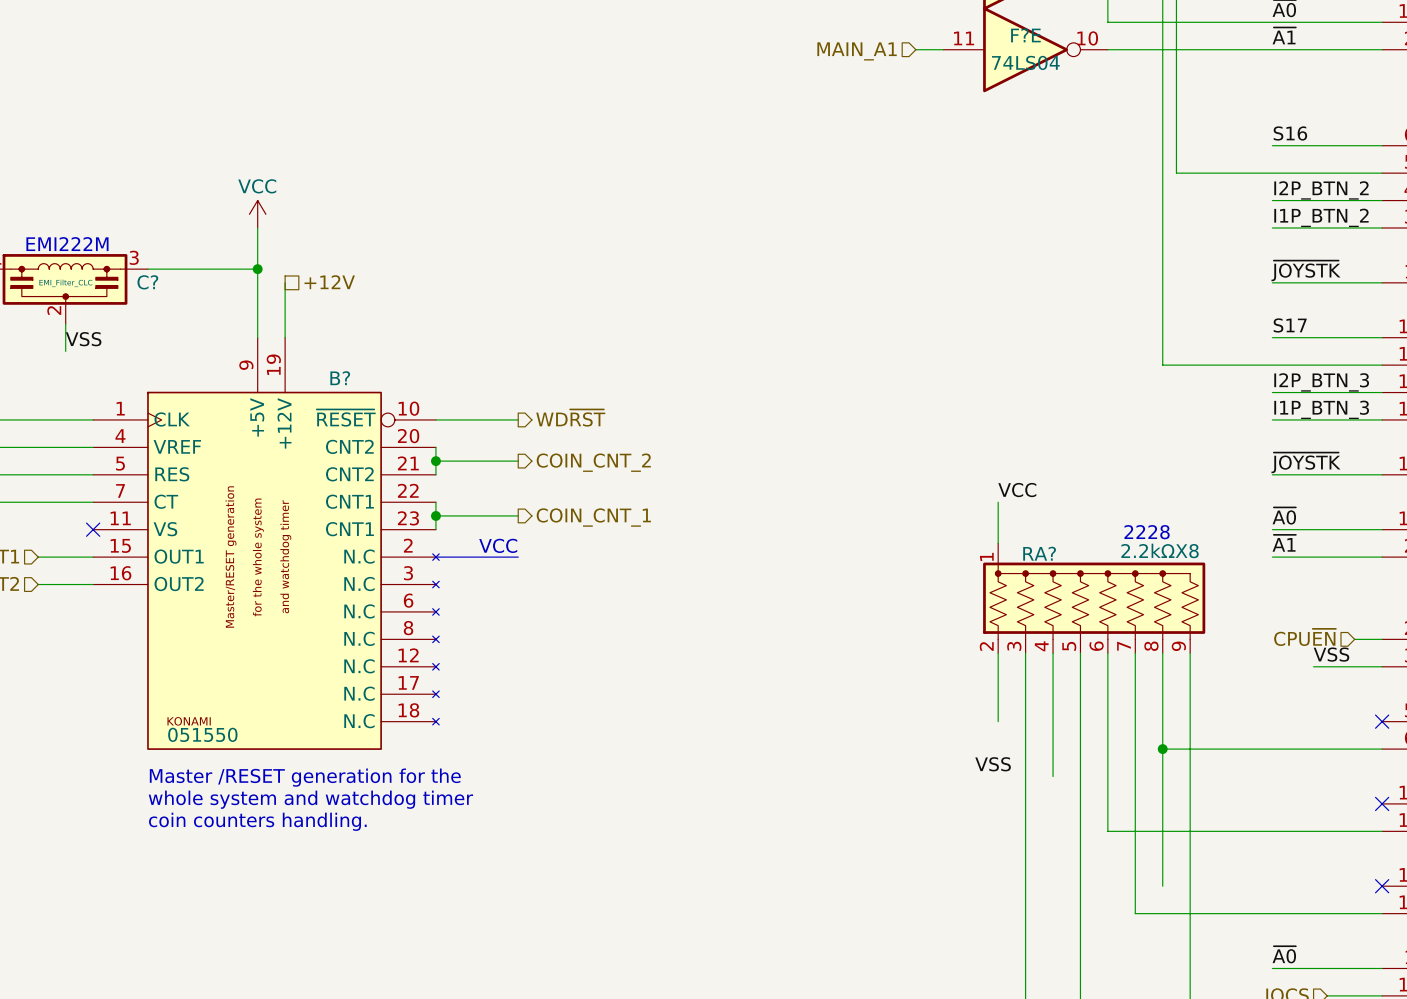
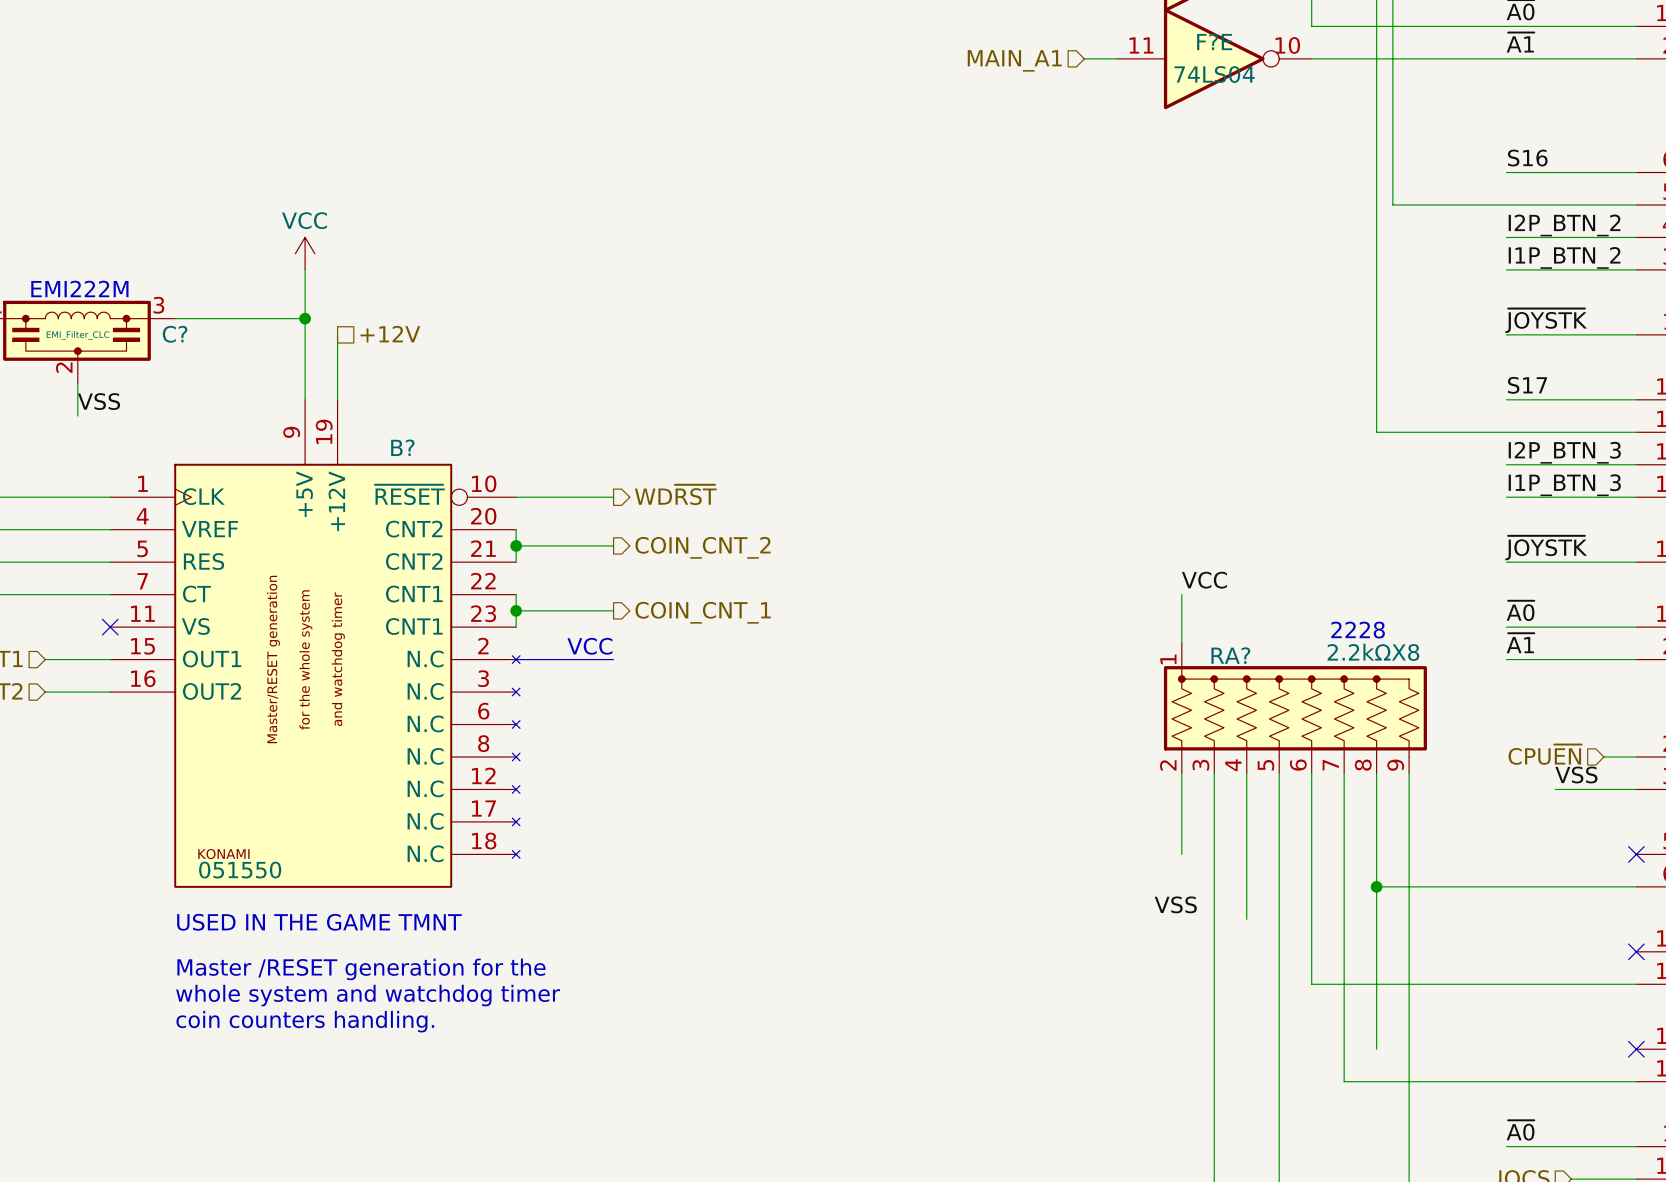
text: Master /RESET generation for the (305, 777) -> USED IN THE GAME TMNT (319, 922)
text position: whole system and watchdog timer (310, 799) -> whole system and watchdog timer (368, 995)
text: coin counters handling. (257, 821) -> Master /RESET generation for the (361, 969)
text: none -> coin counters handling. (305, 1021)

